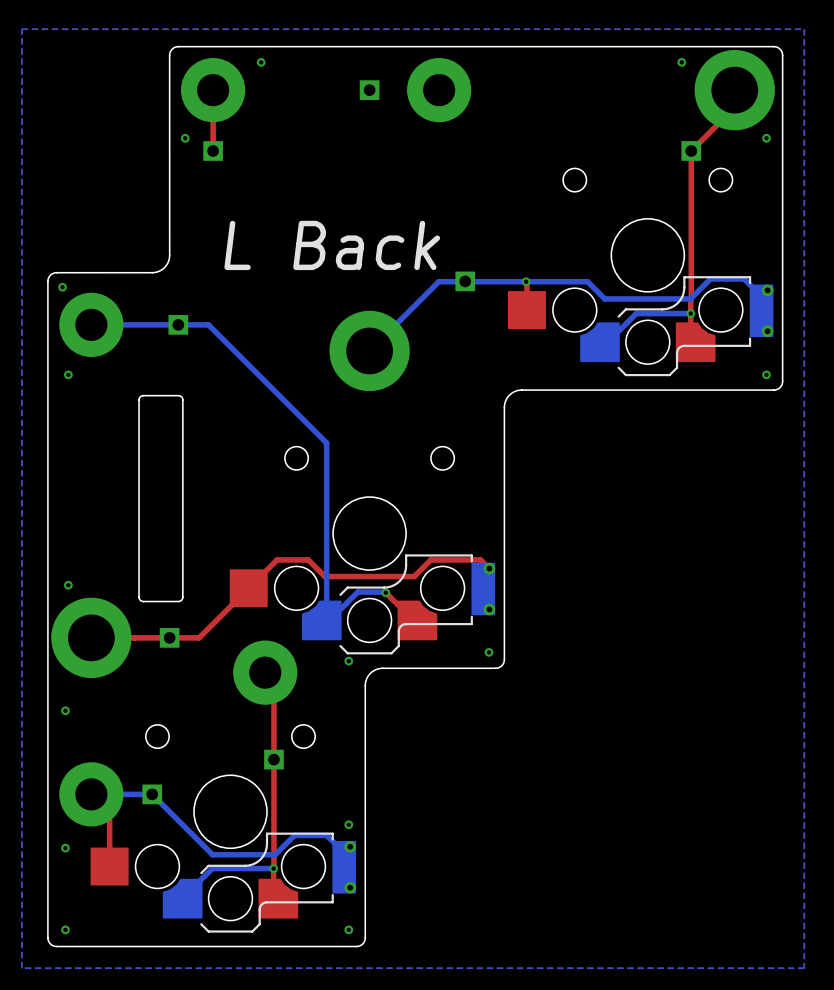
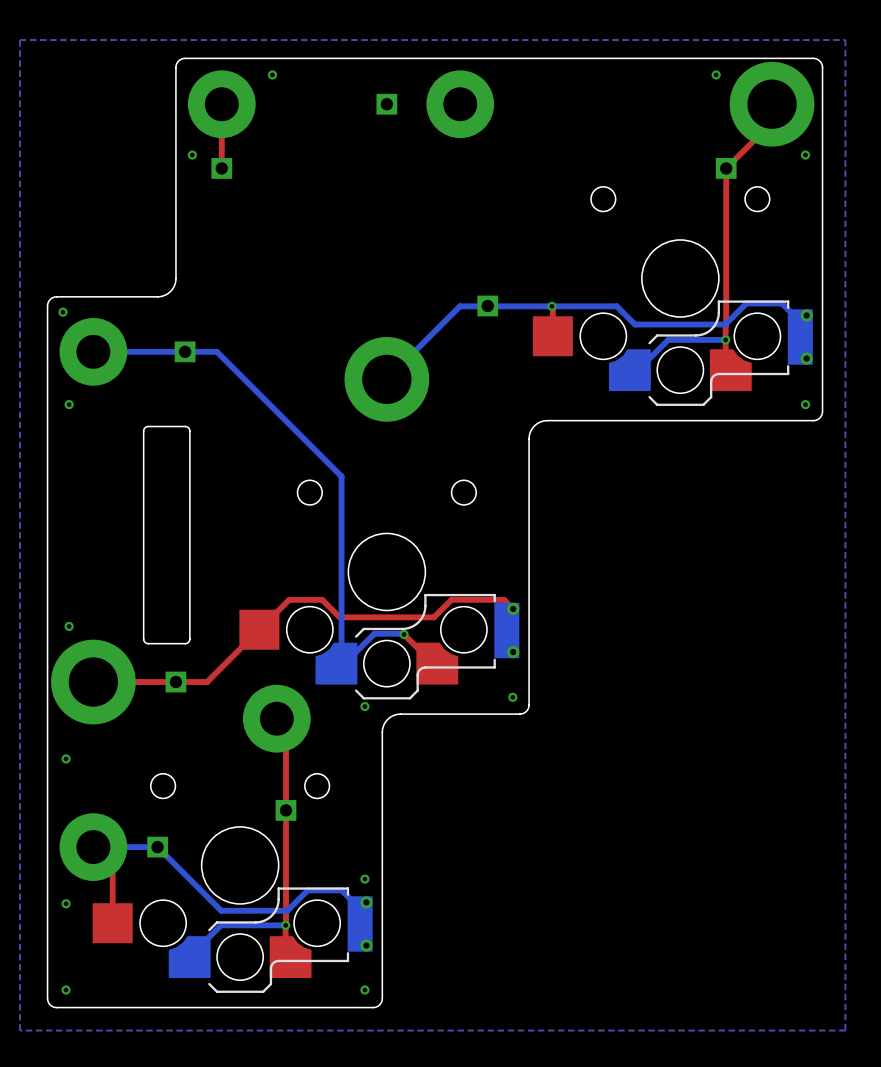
text: L Back (332, 245) -> none

